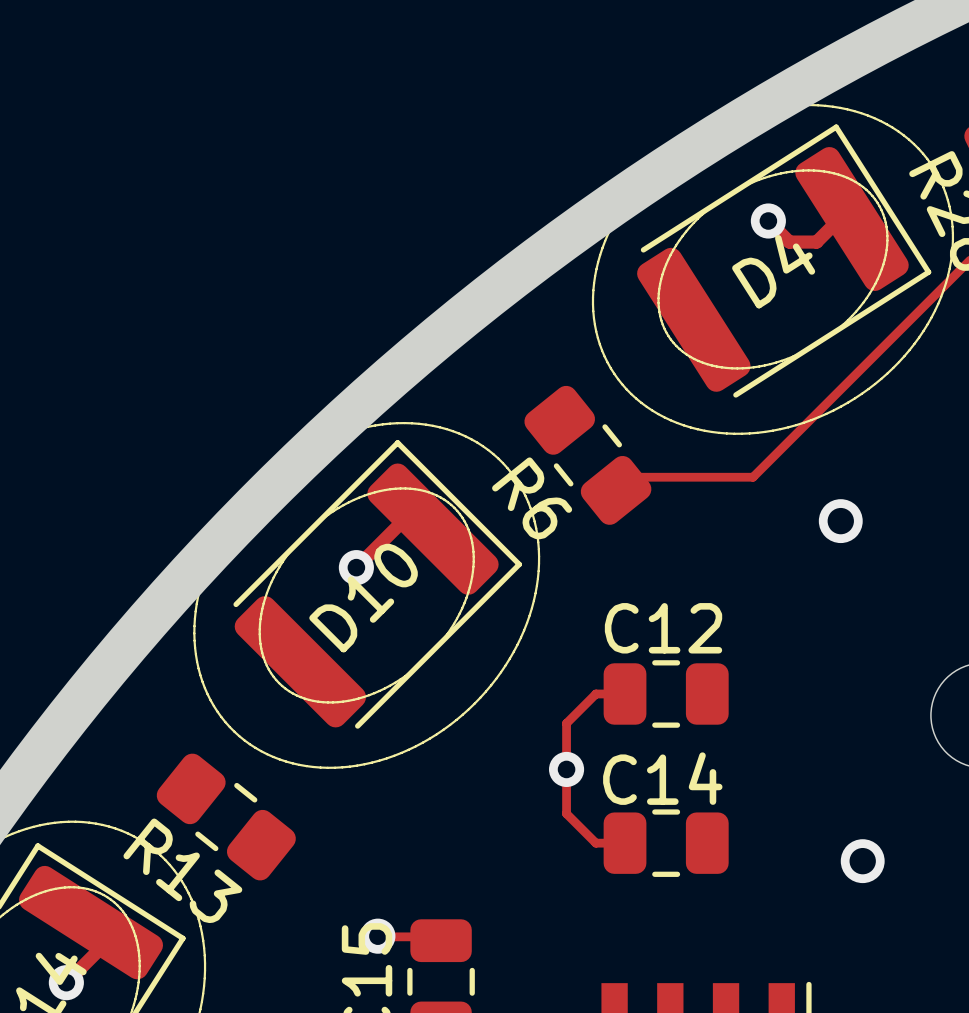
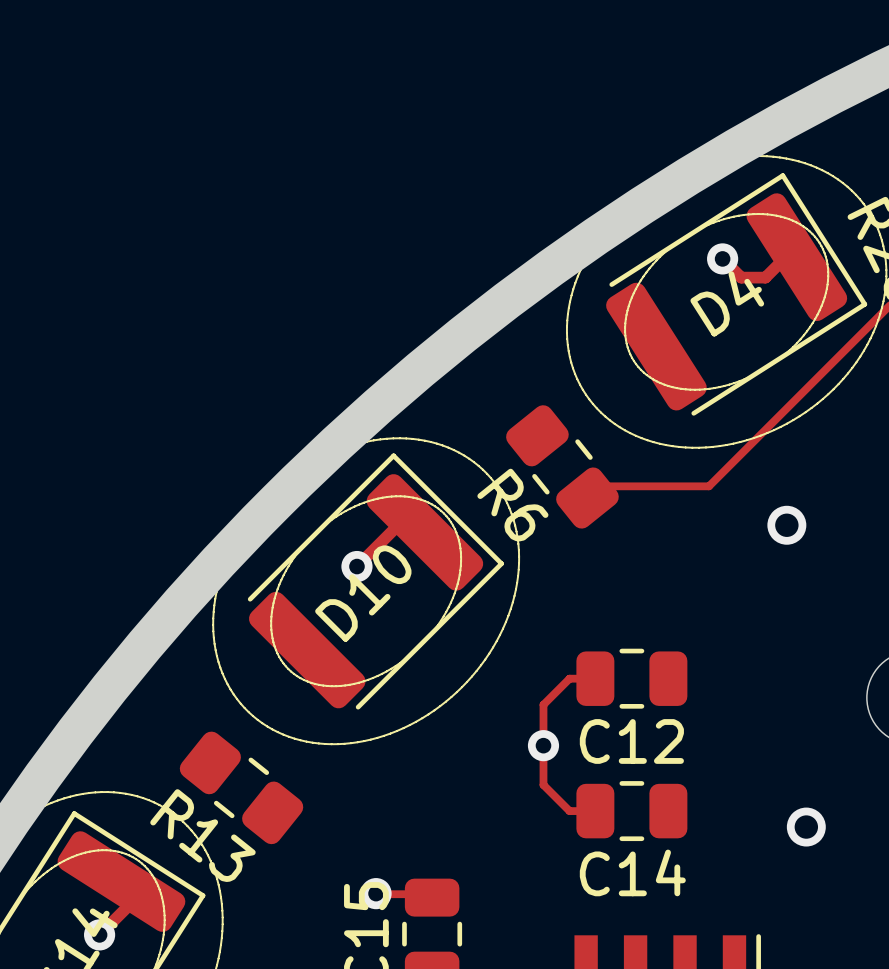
C12 name position: C12 (663, 628) -> C12 (631, 741)
C14 name position: C14 (662, 778) -> C14 (632, 872)

